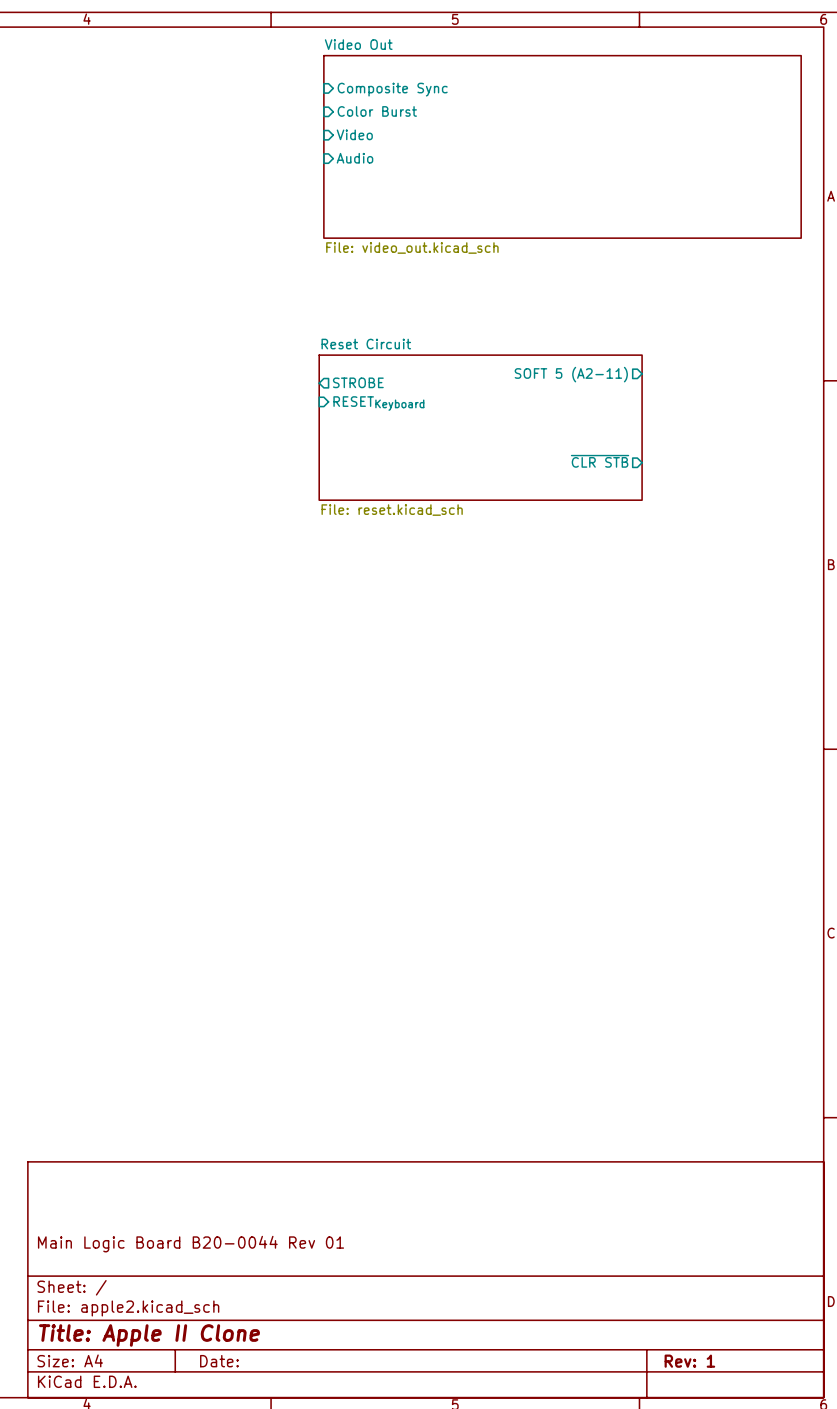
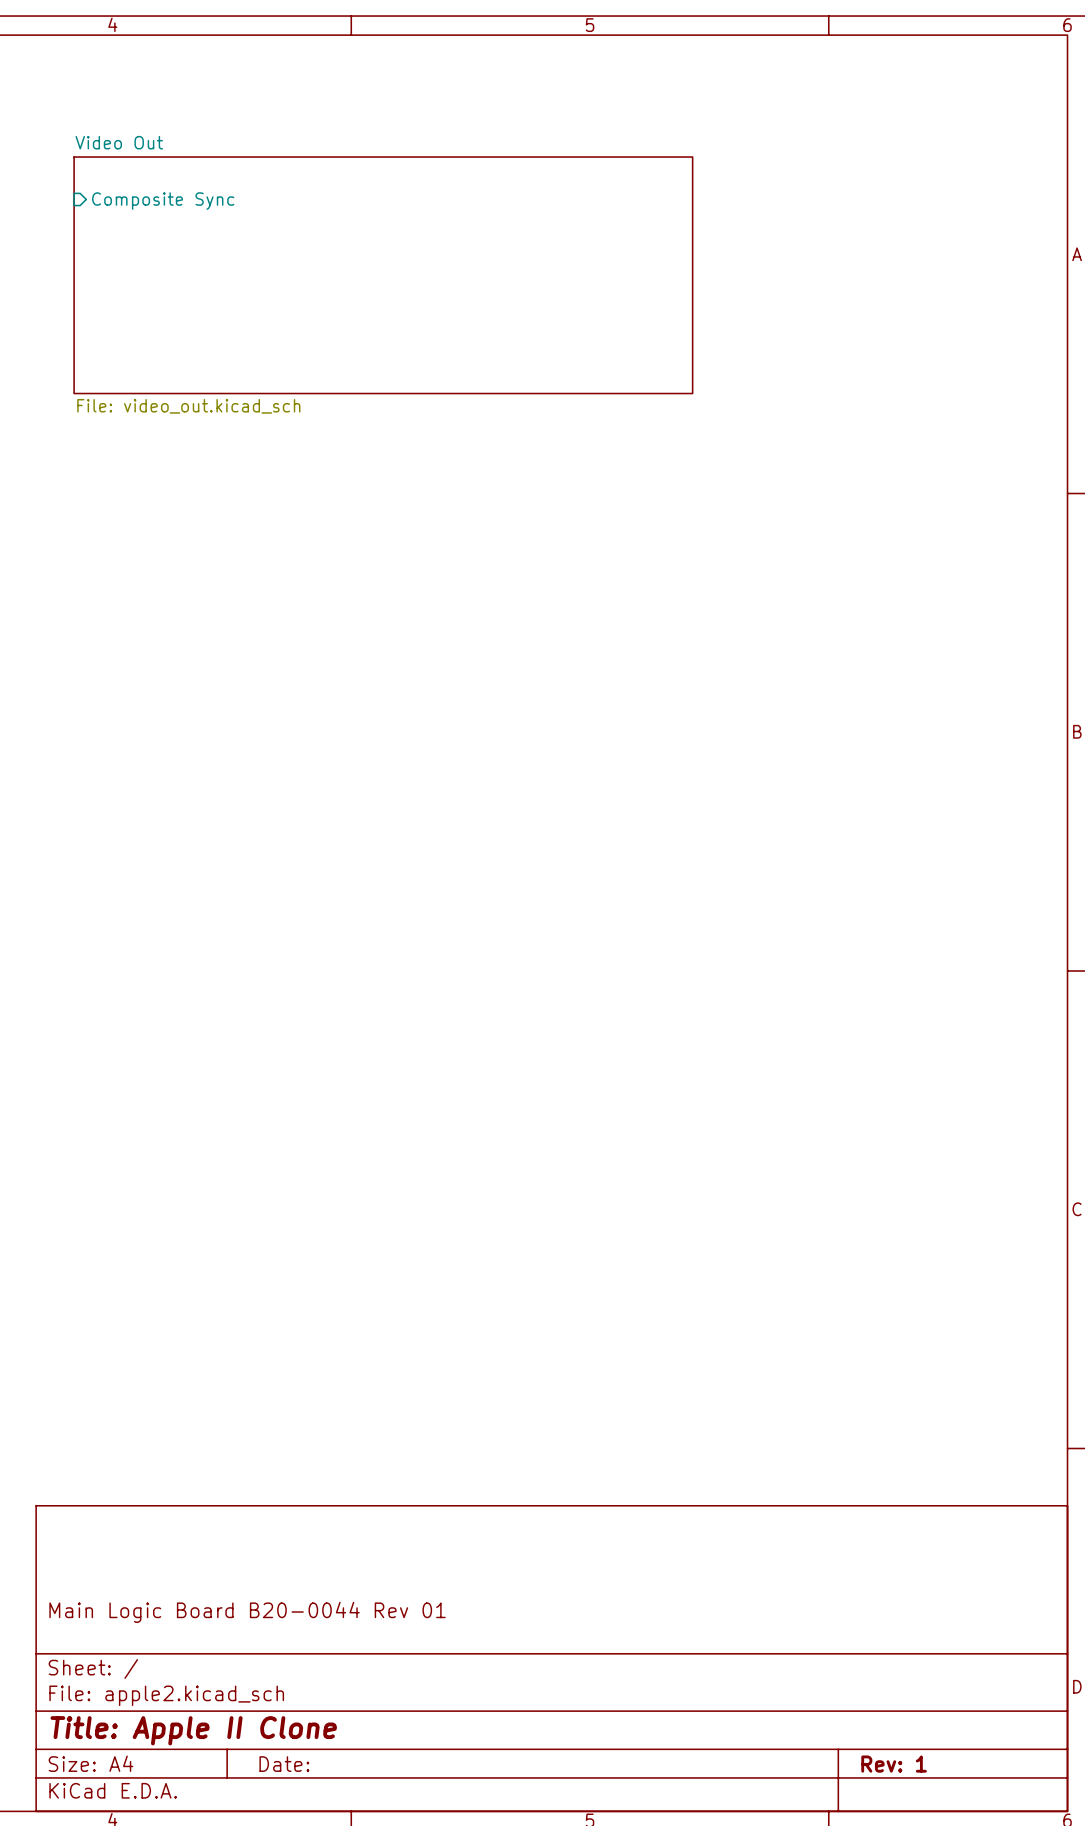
sheet pin: Composite Sync (392, 89) -> none
sheet pin: Color Burst (377, 111) -> none
sheet pin: Video (354, 134) -> none
sheet Video Out: File: video_out.kicad_sch (562, 146) -> none
sheet pin: none -> Composite Sync (163, 201)
sheet pin: Audio (355, 158) -> none
sheet Video Out: none -> File: video_out.kicad_sch (383, 275)
sheet pin: SOFT 5 (A2-11) (571, 374) -> none
sheet pin: STROBE (358, 382) -> none
sheet pin: RESETKeyboard (378, 403) -> none
sheet Reset Circuit: File: reset.kicad_sch (480, 427) -> none
sheet pin: ~{CLR STB} (600, 461) -> none

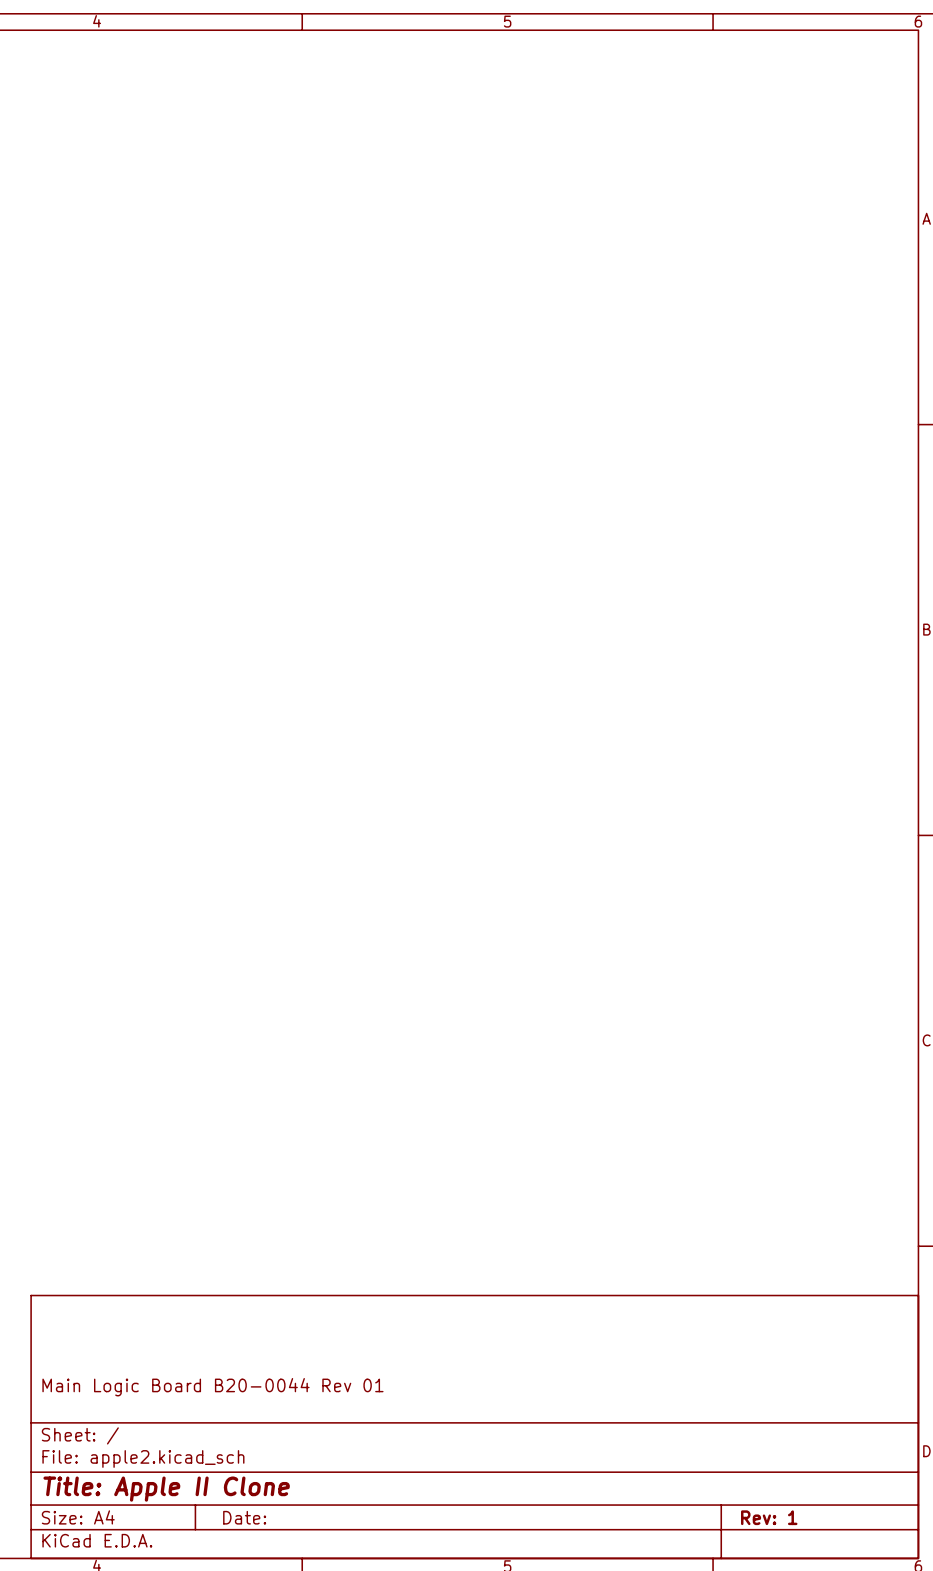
sheet pin: Composite Sync (163, 201) -> none
sheet Video Out: File: video_out.kicad_sch (383, 275) -> none

